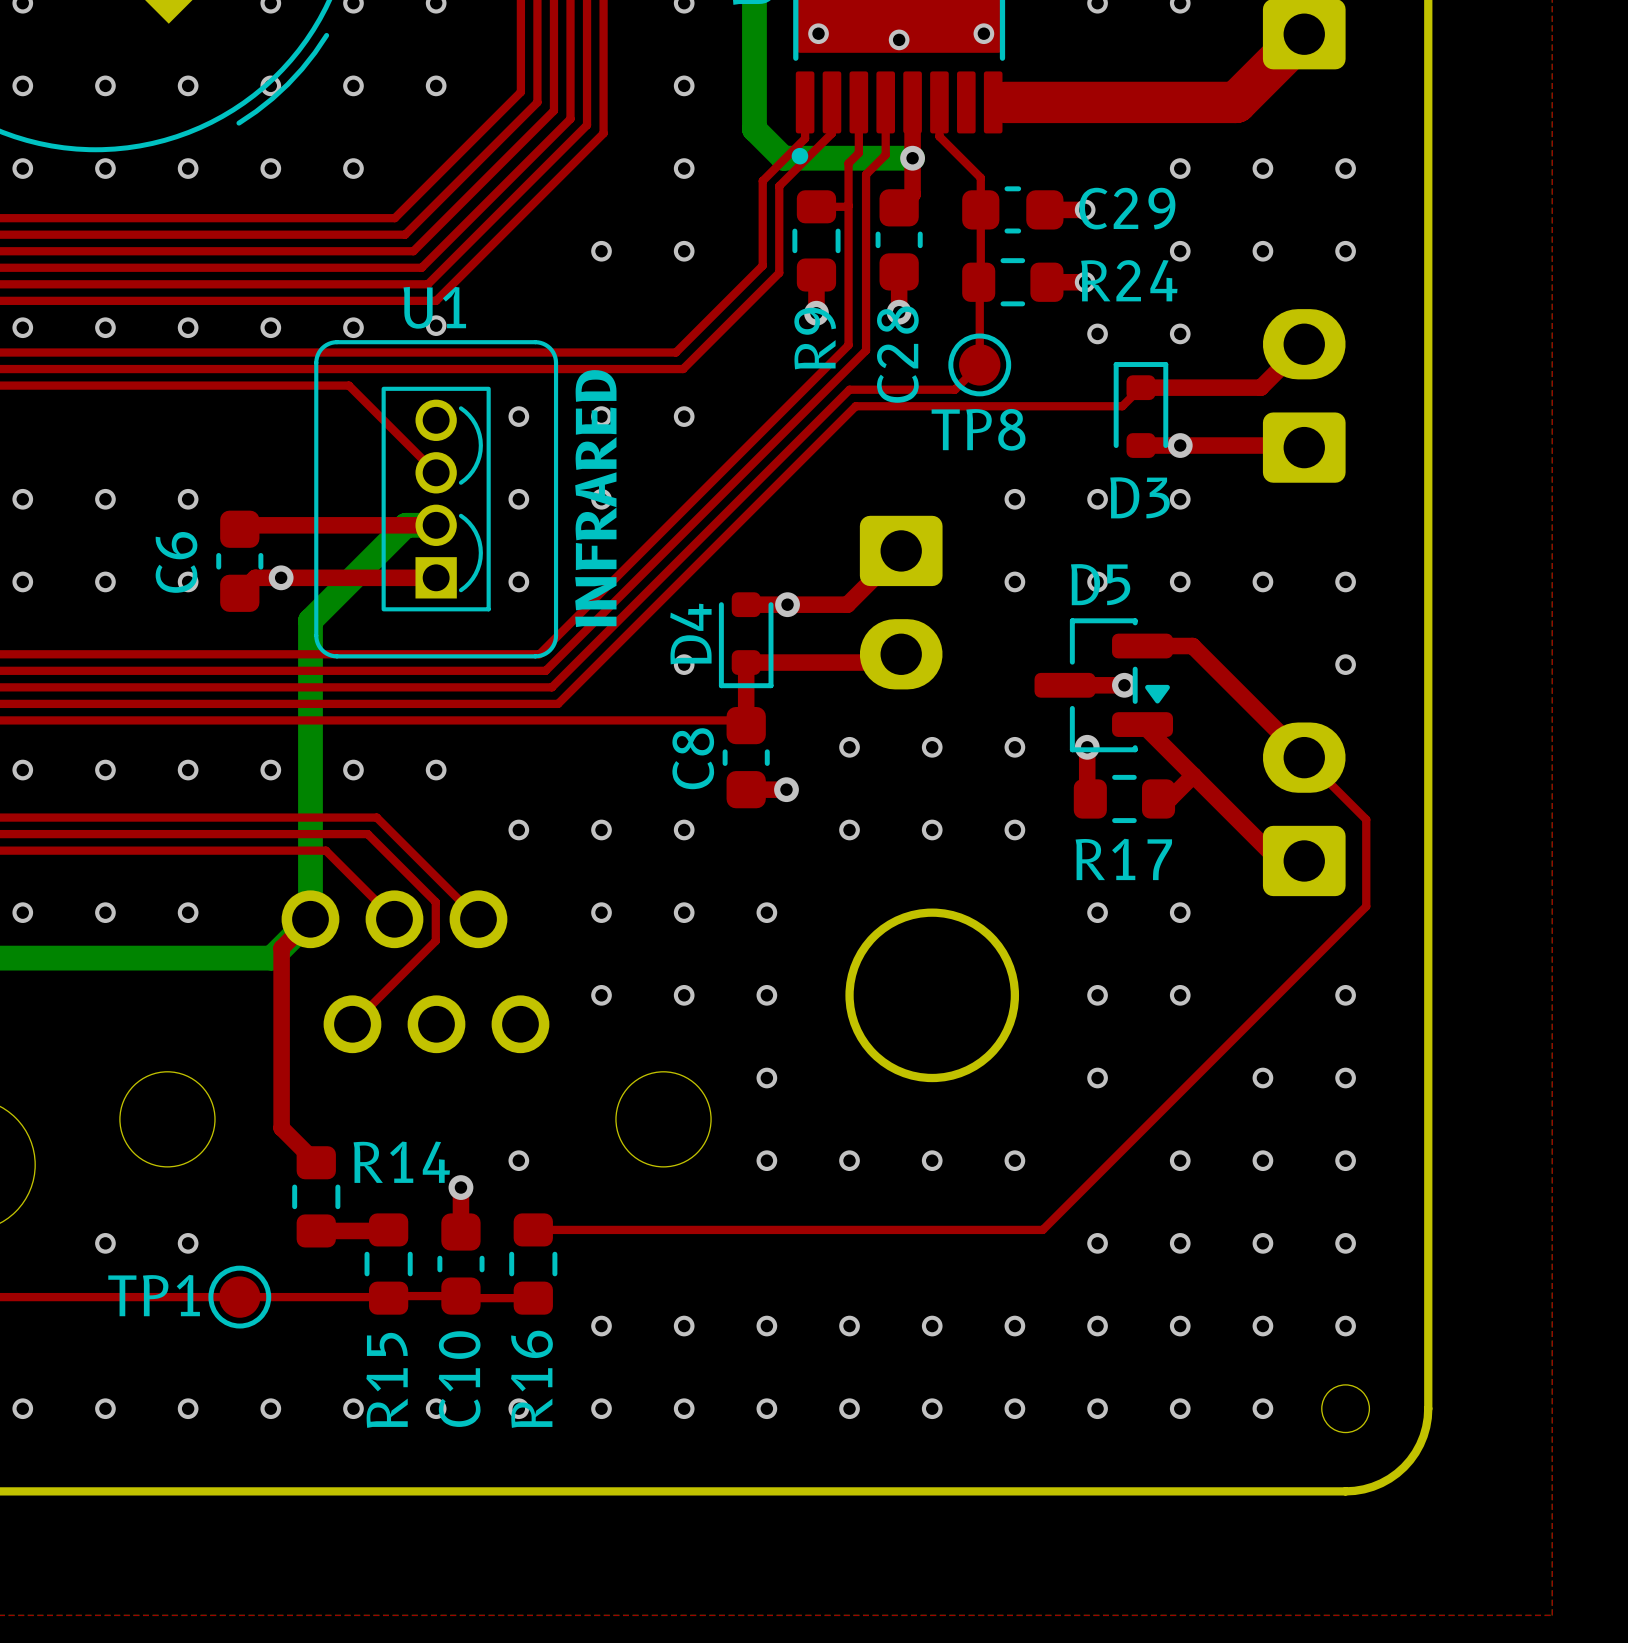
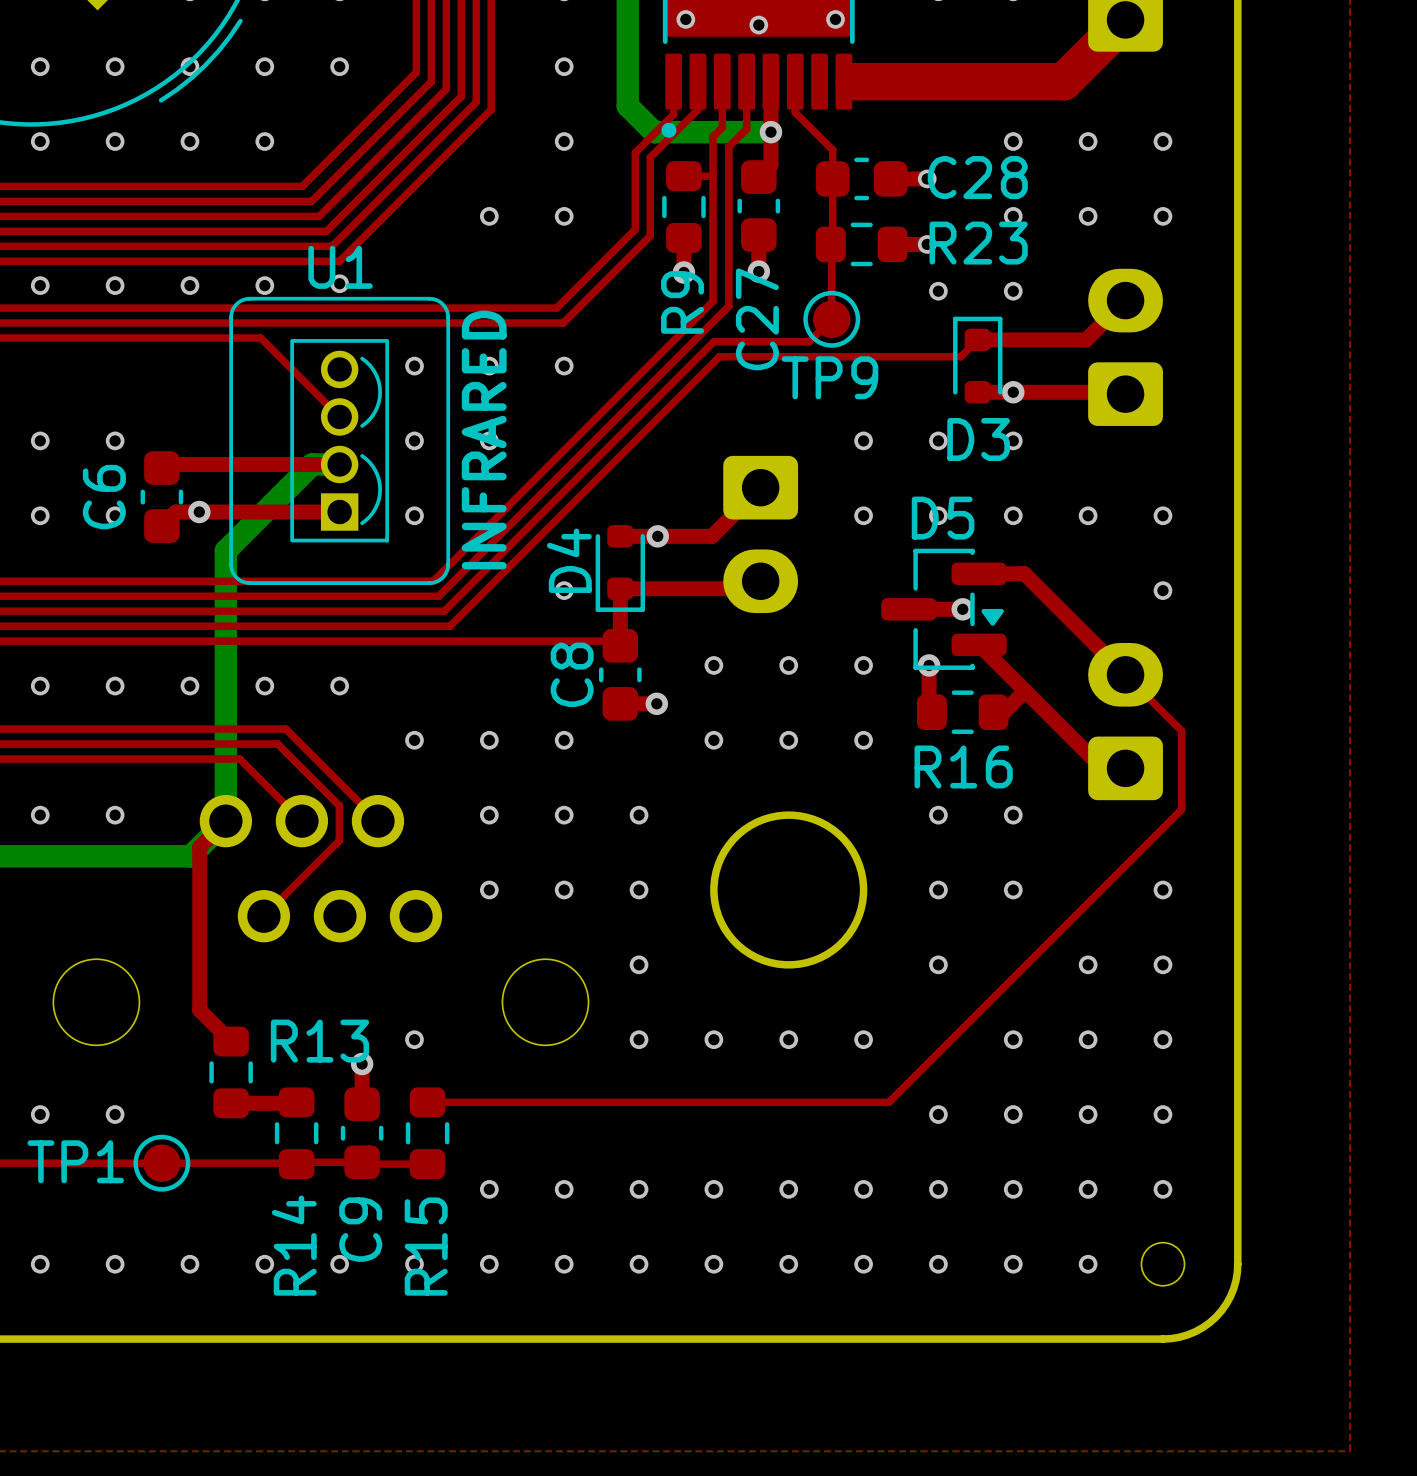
C29 name: C29 (1127, 208) -> C28 (977, 177)
R24 name: R24 (1129, 280) -> R23 (978, 243)
C28 name: C28 (897, 354) -> C27 (757, 319)
TP8 name: TP8 (978, 429) -> TP9 (829, 377)
R17 name: R17 (1123, 859) -> R16 (963, 766)
R14 name: R14 (401, 1162) -> R13 (320, 1041)
C10 name: C10 (459, 1379) -> C9 (360, 1229)
R16 name: R16 (531, 1379) -> R15 (426, 1246)
R15 name: R15 (387, 1380) -> R14 (294, 1245)

